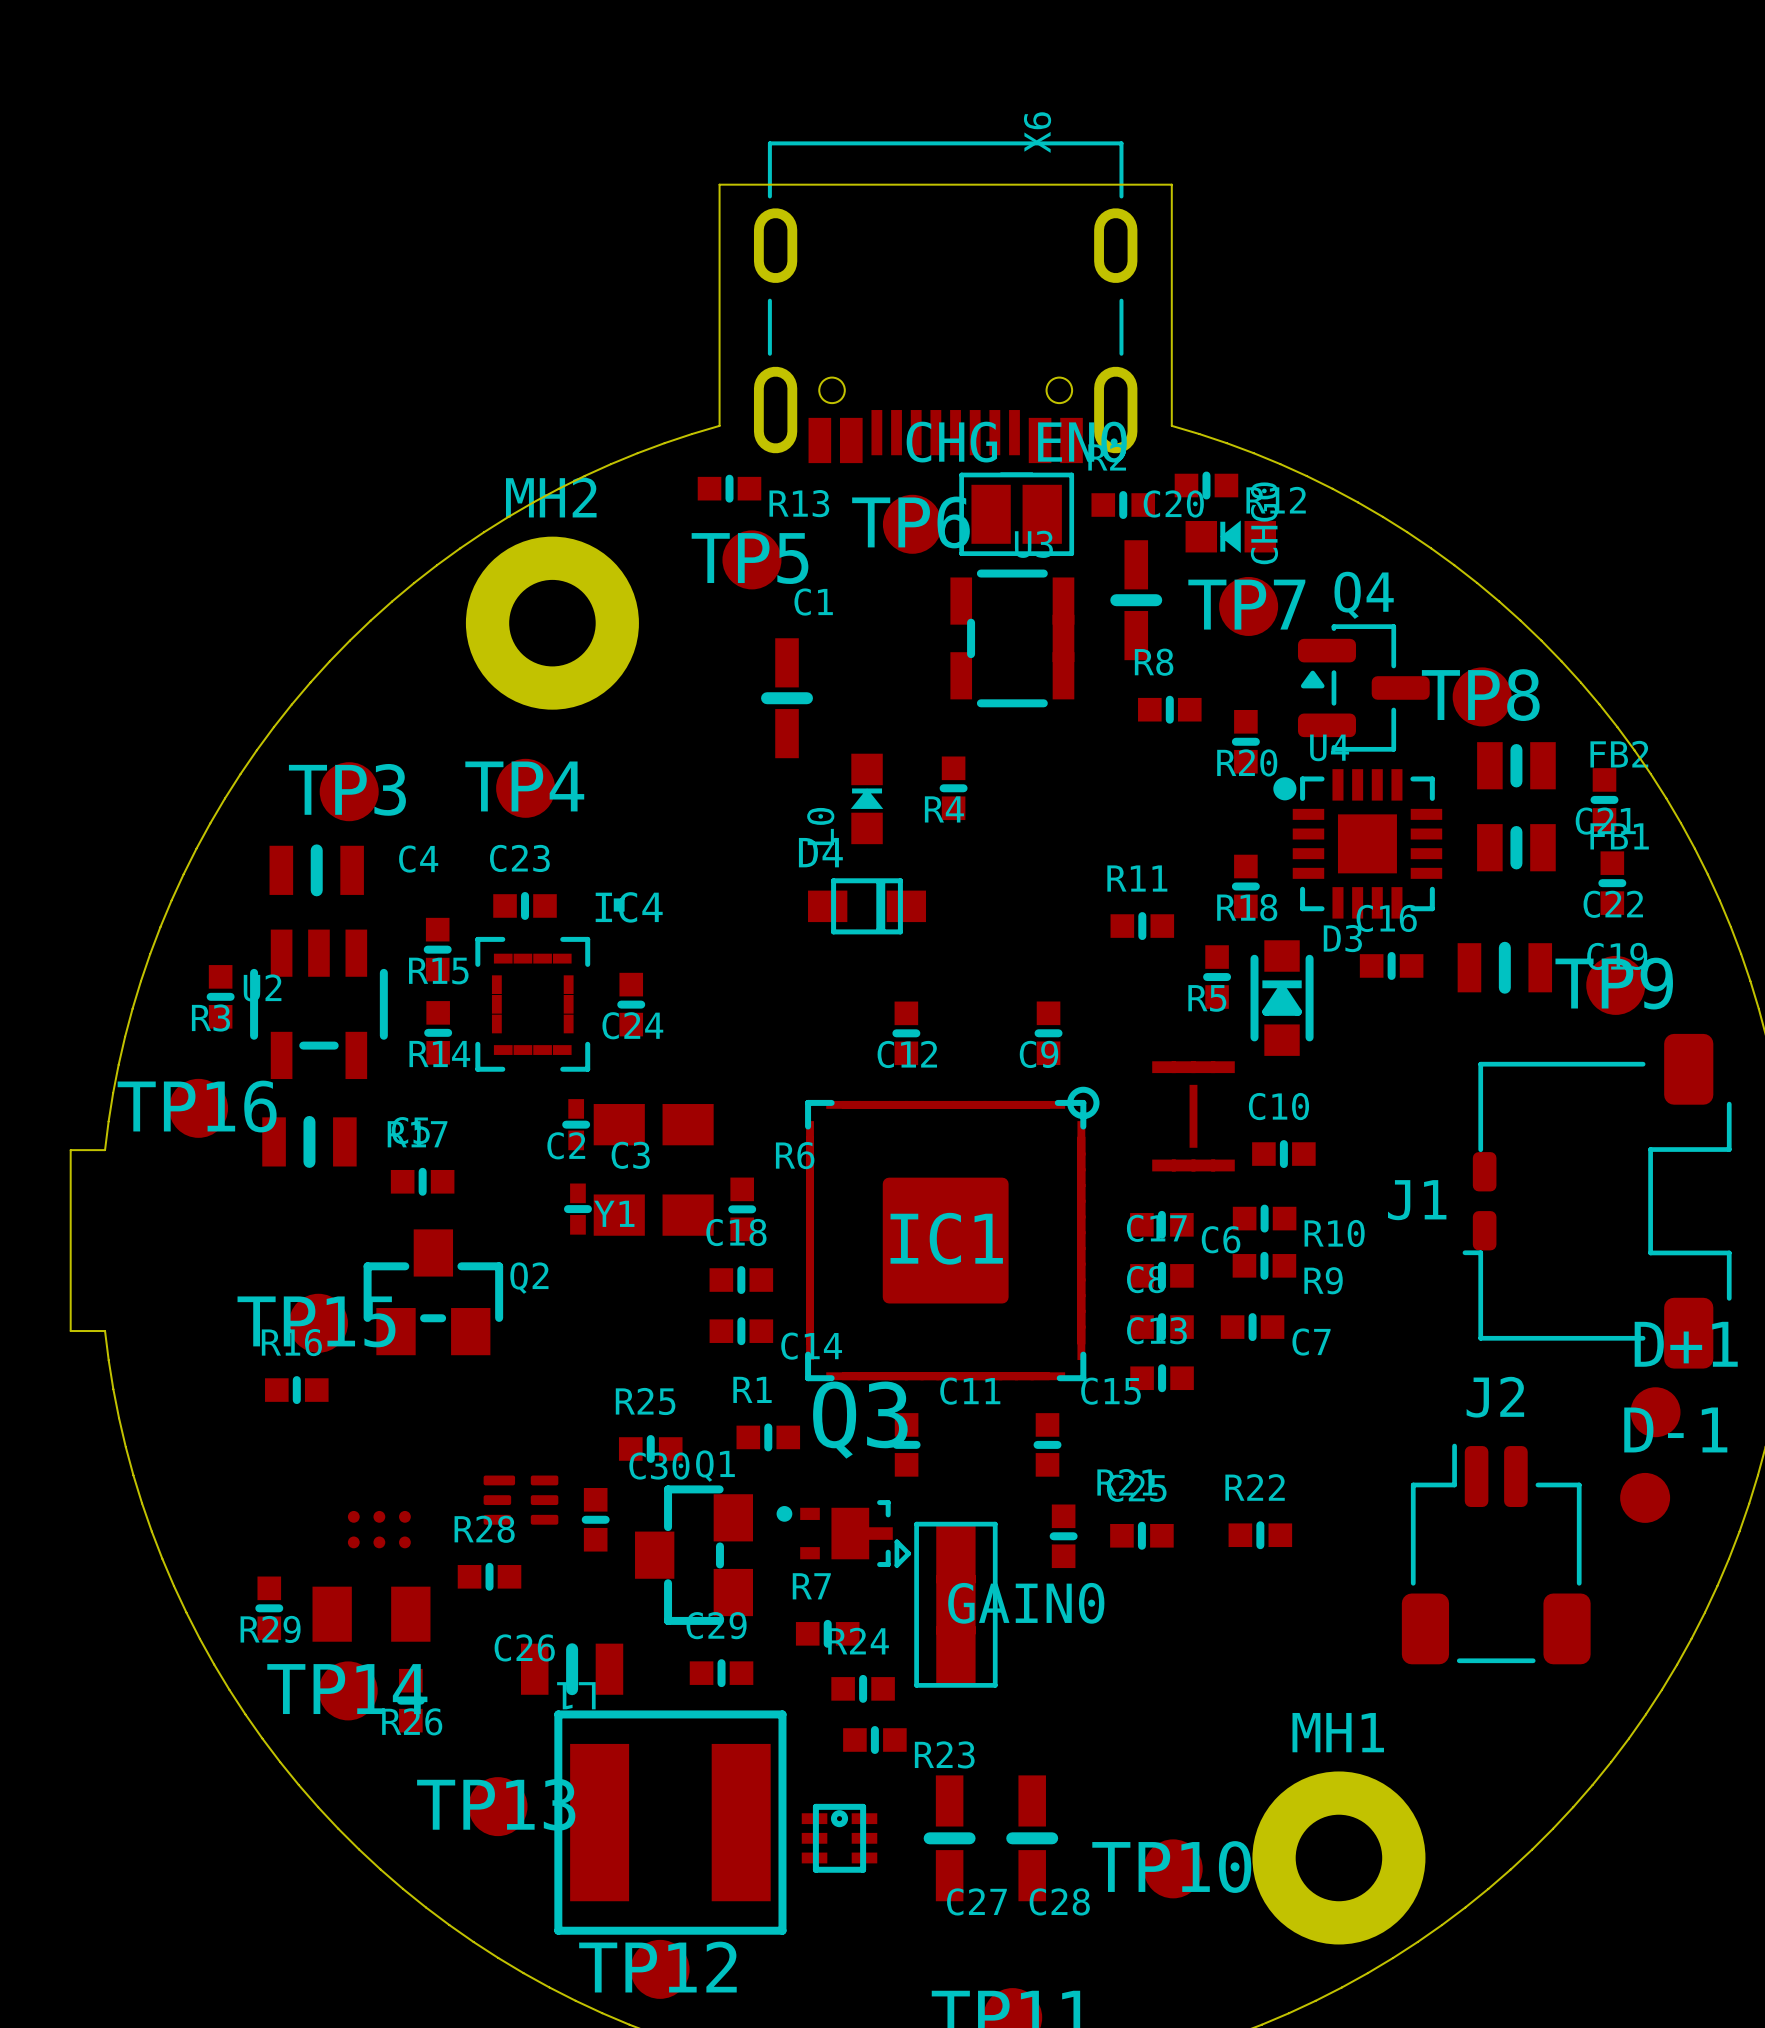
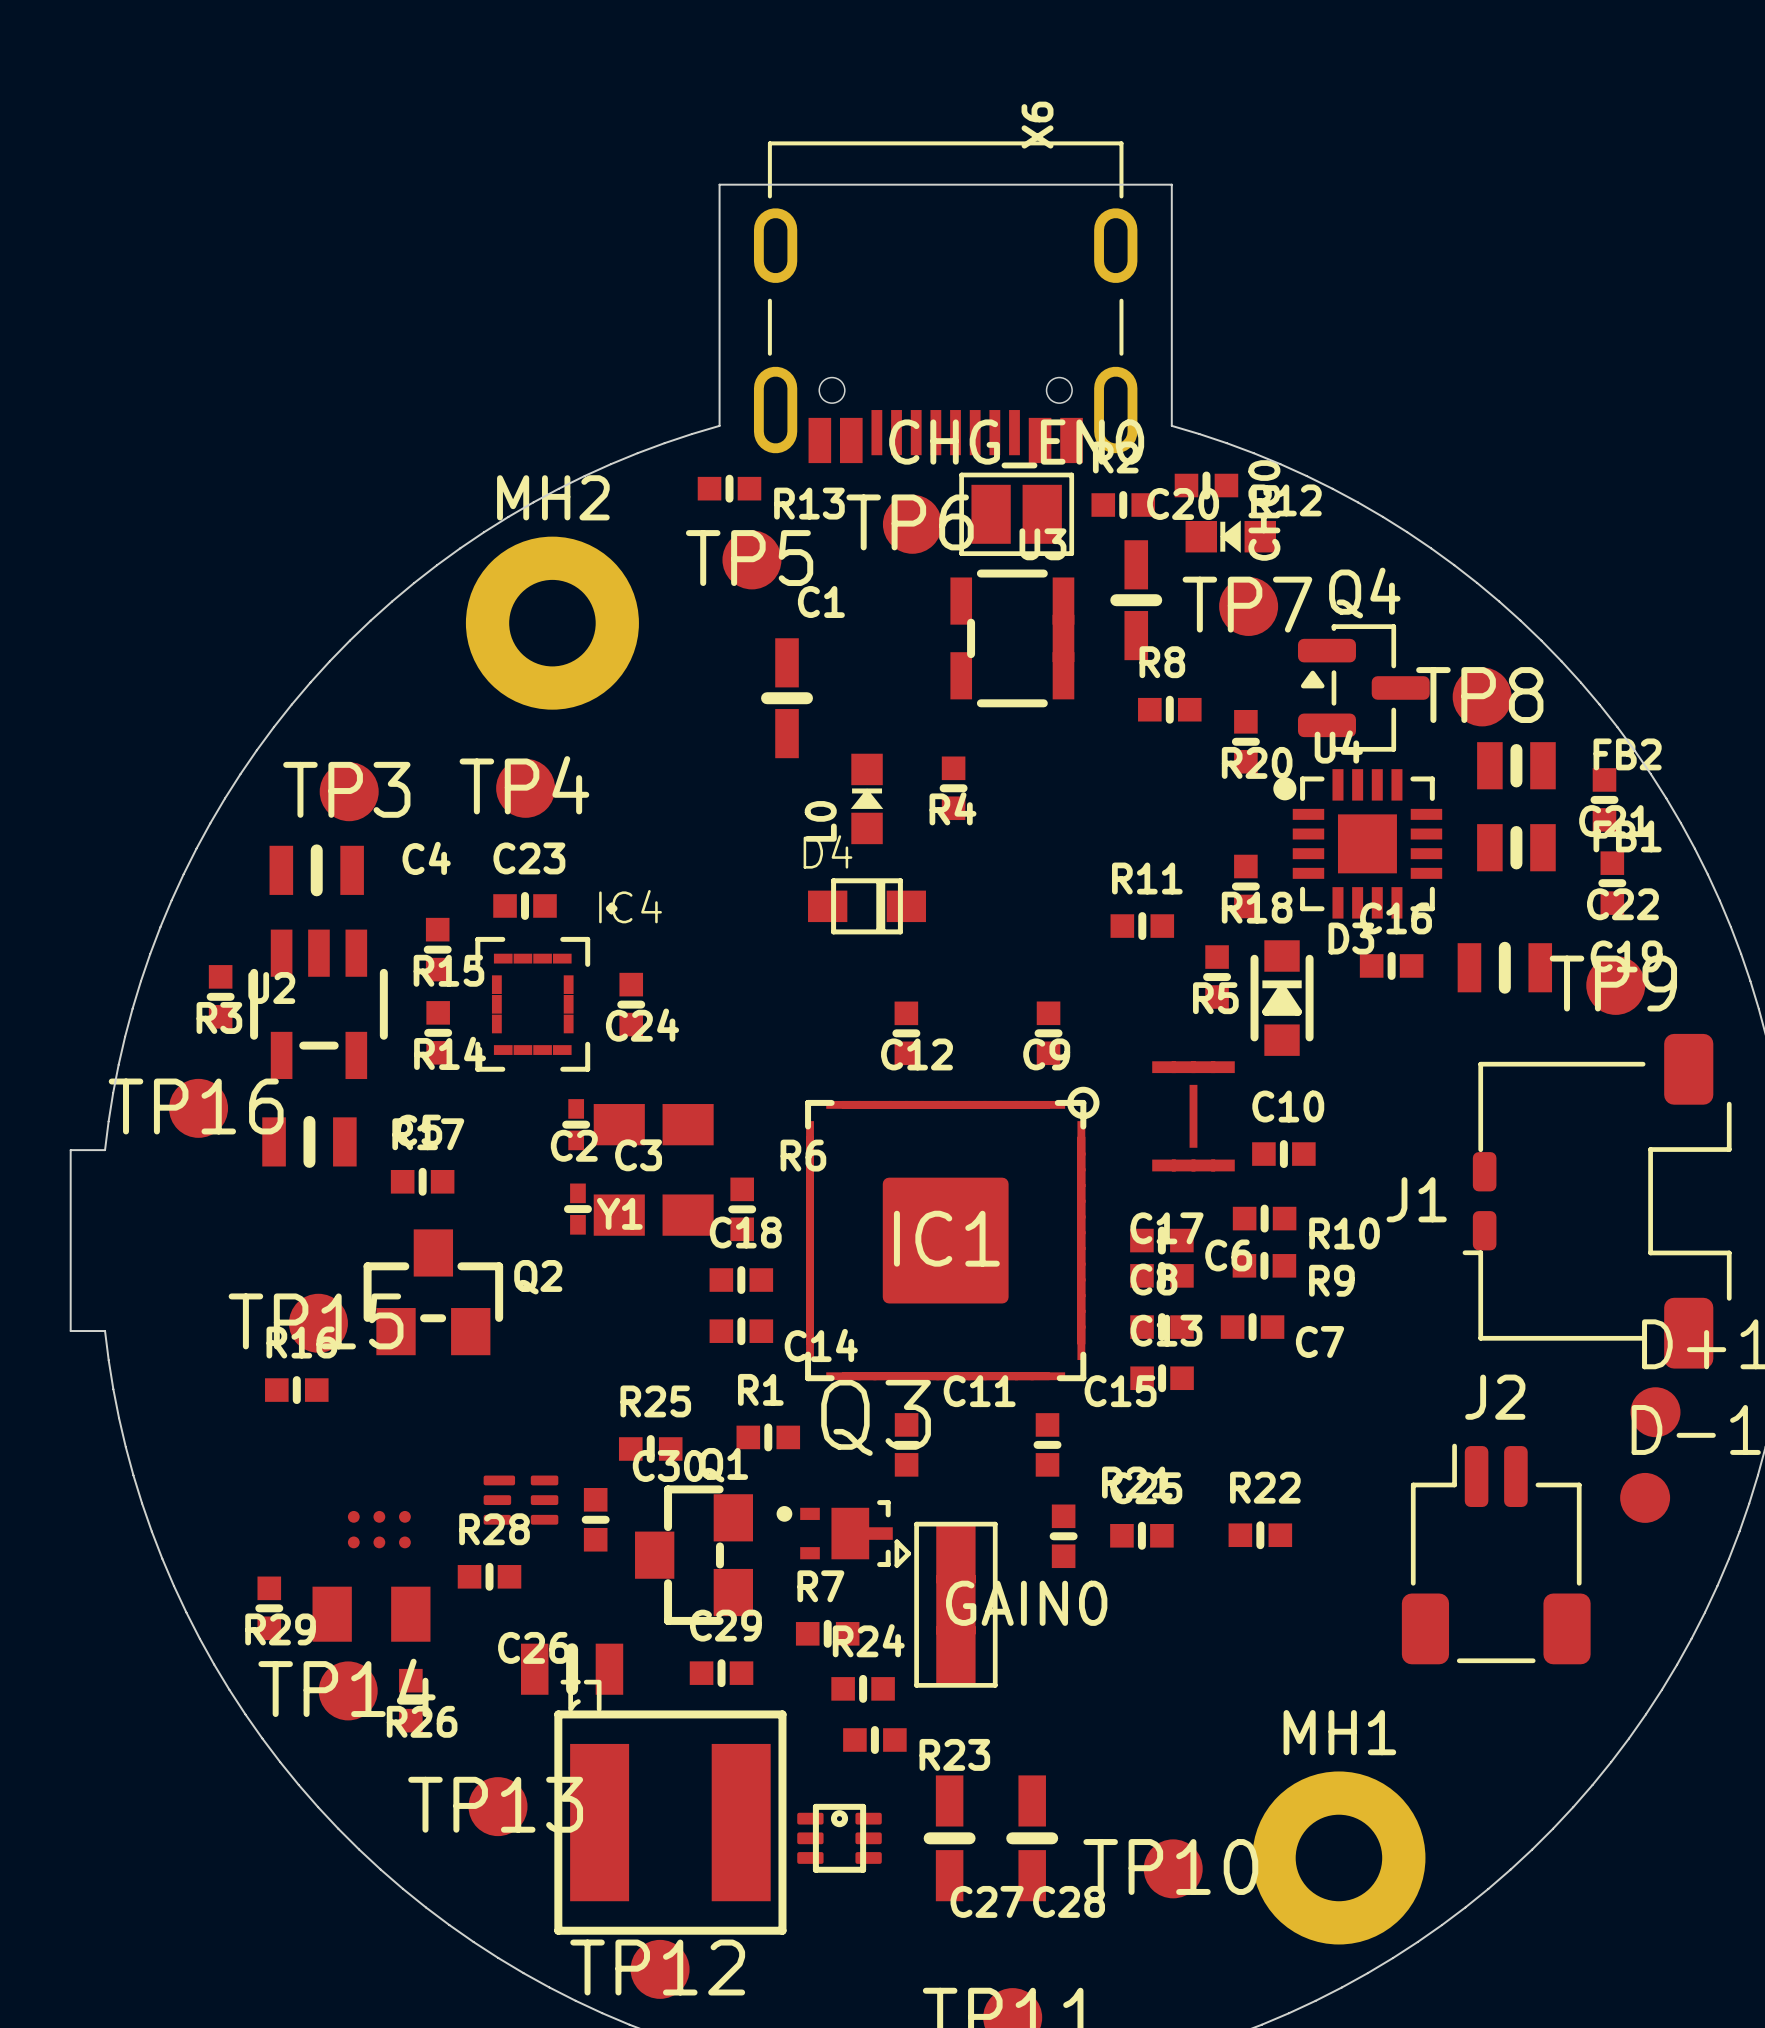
C6 position: (1161, 1224) -> (1161, 1240)
part footprint: [801, 1803, 878, 1873] -> [797, 1803, 882, 1873]

